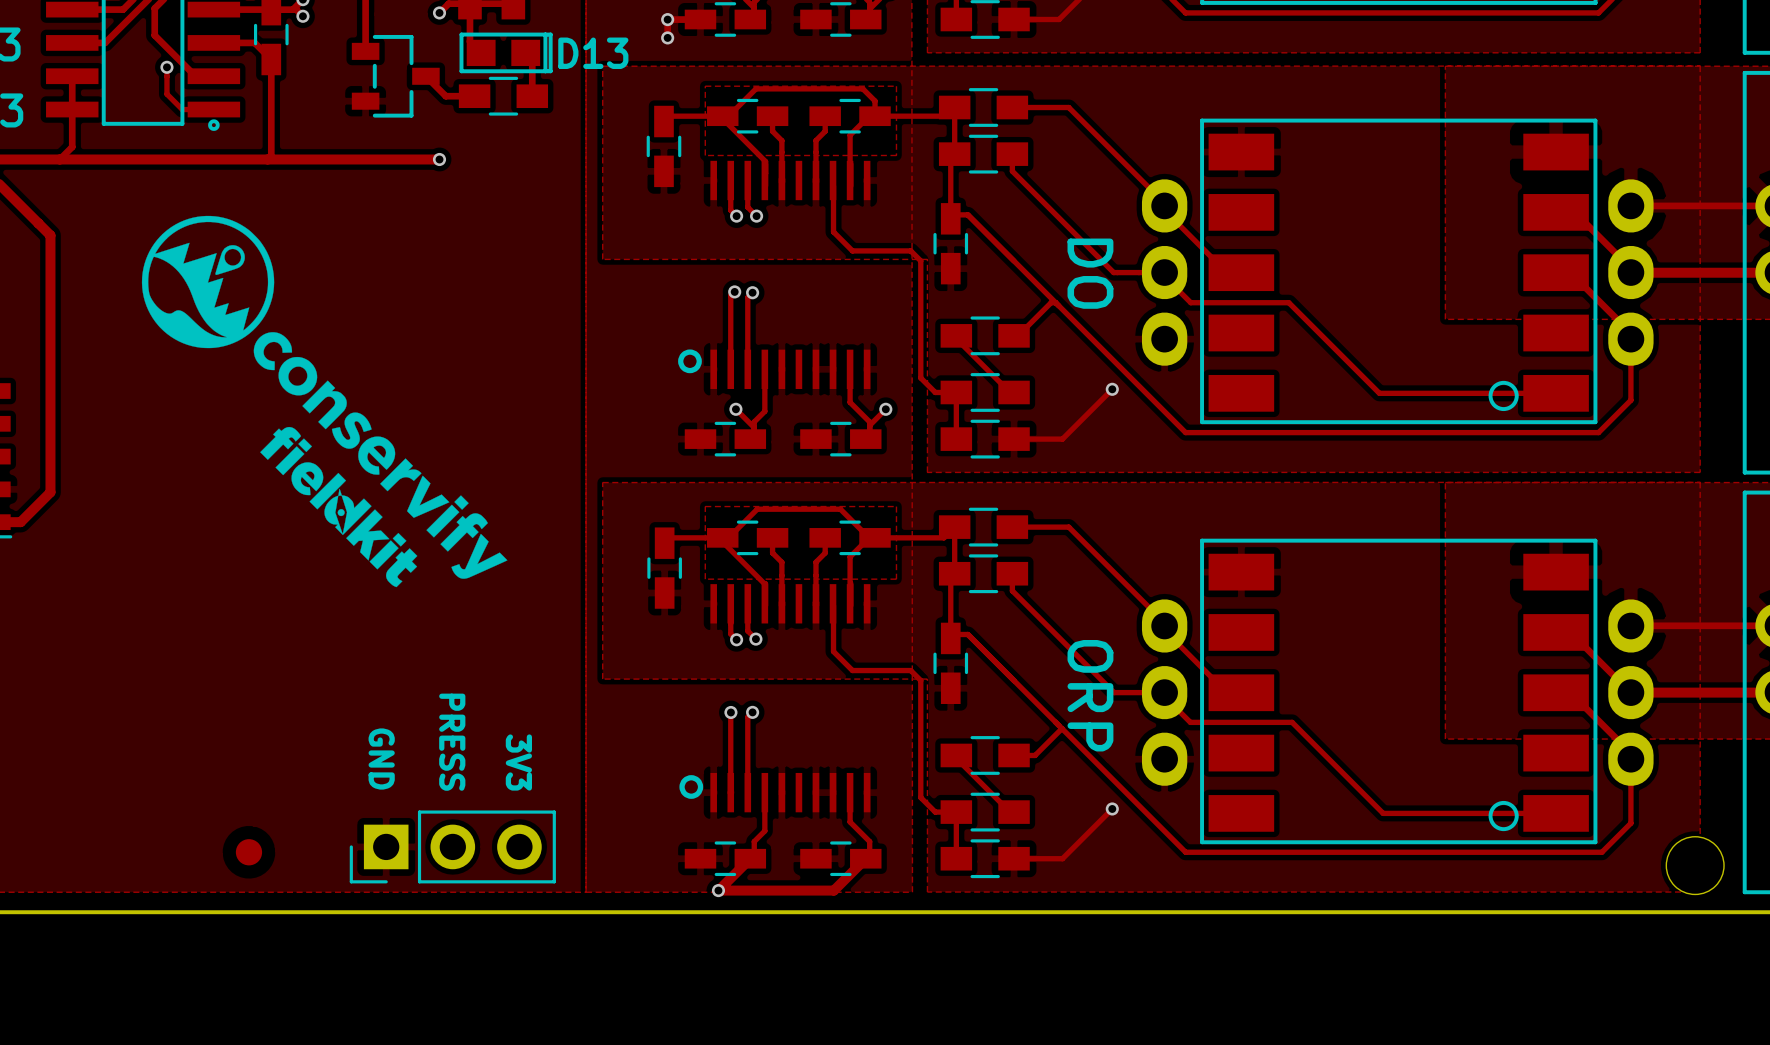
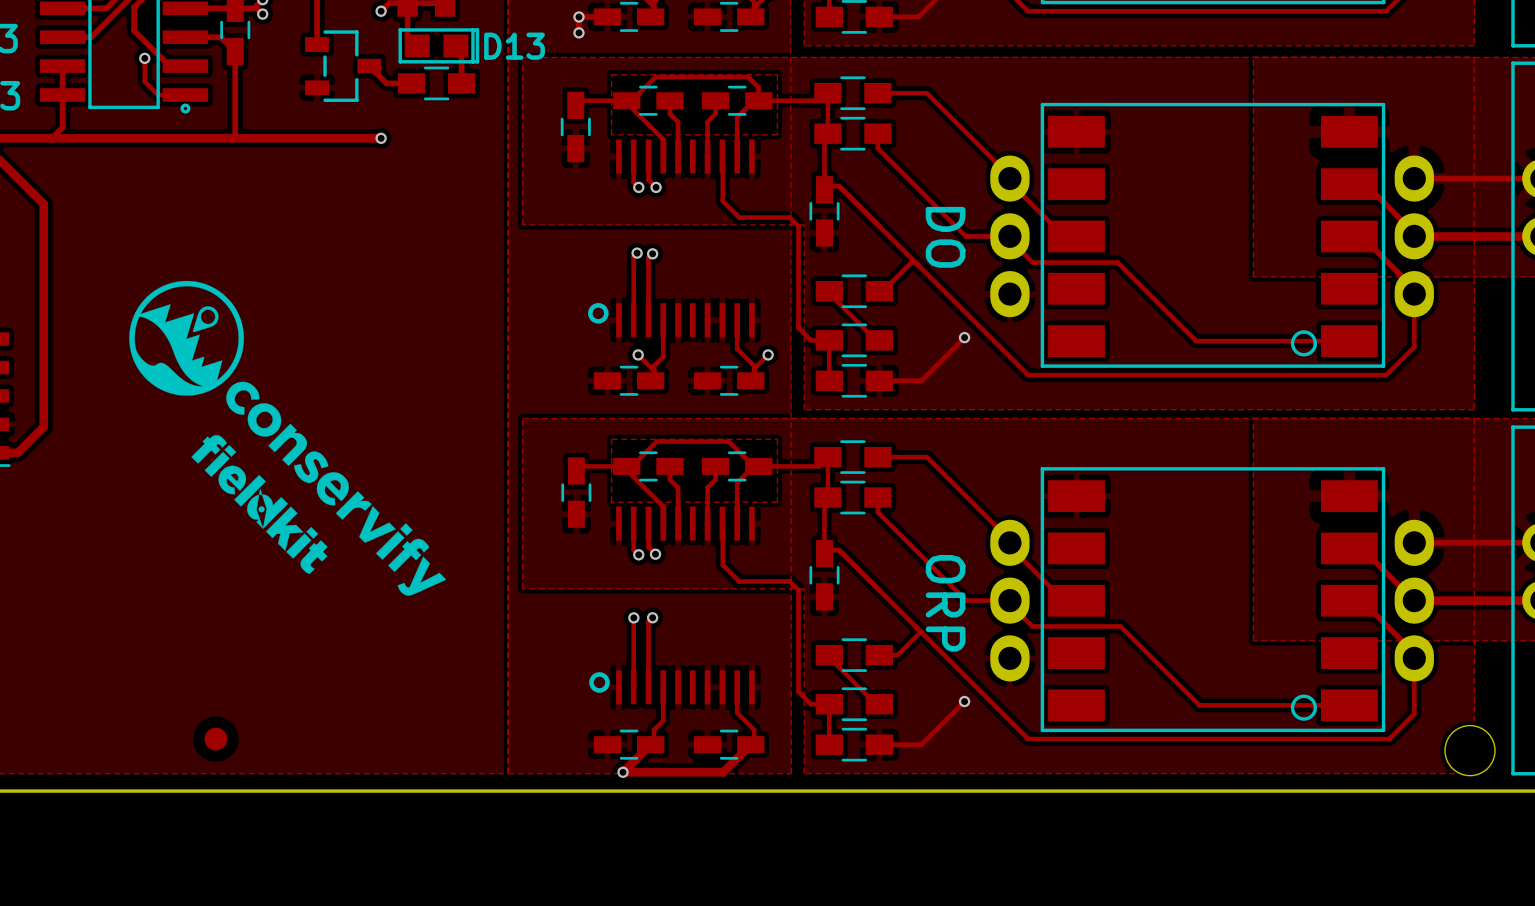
drawing position: (324, 397) -> (287, 438)
drawing position: (338, 507) -> (259, 504)
text: PRESS (452, 742) -> none
text: GND (381, 759) -> none
text: 3V3 (518, 762) -> none
part: (452, 846) -> none

